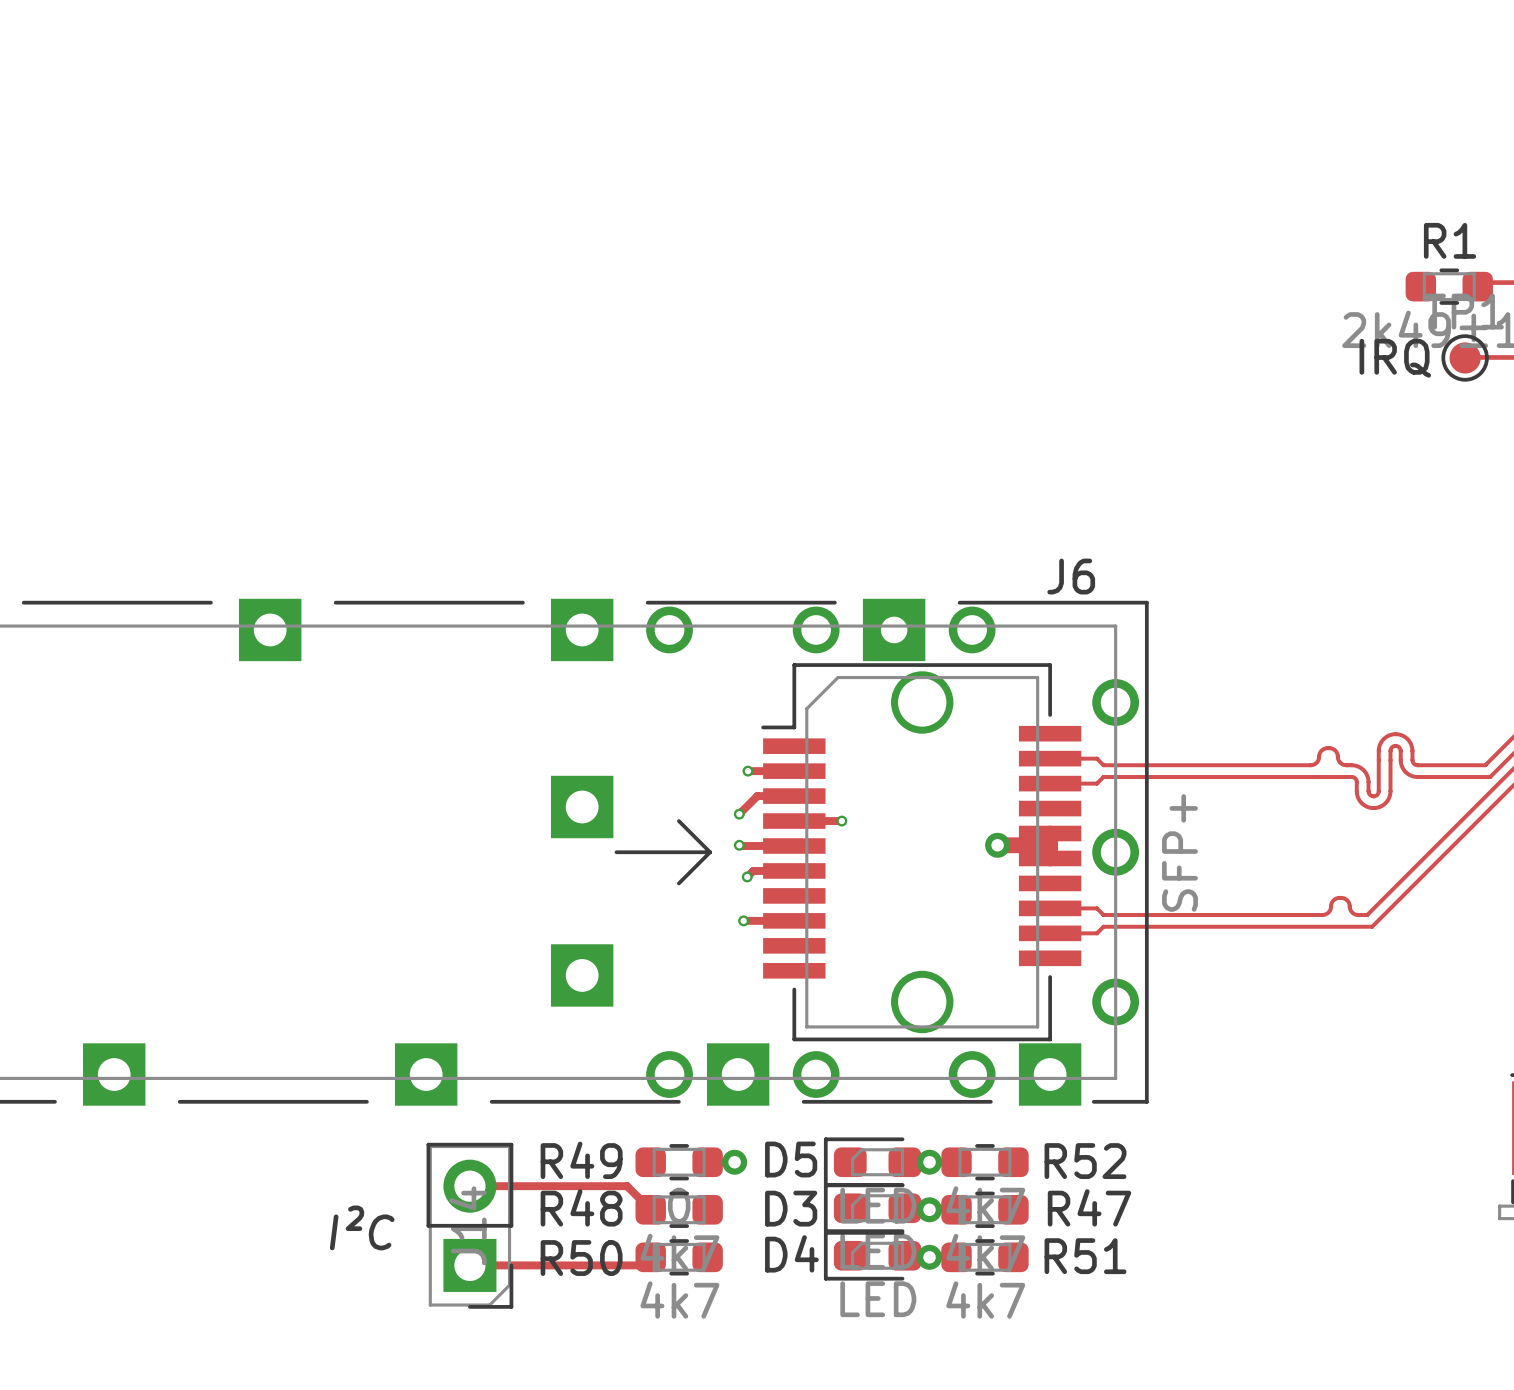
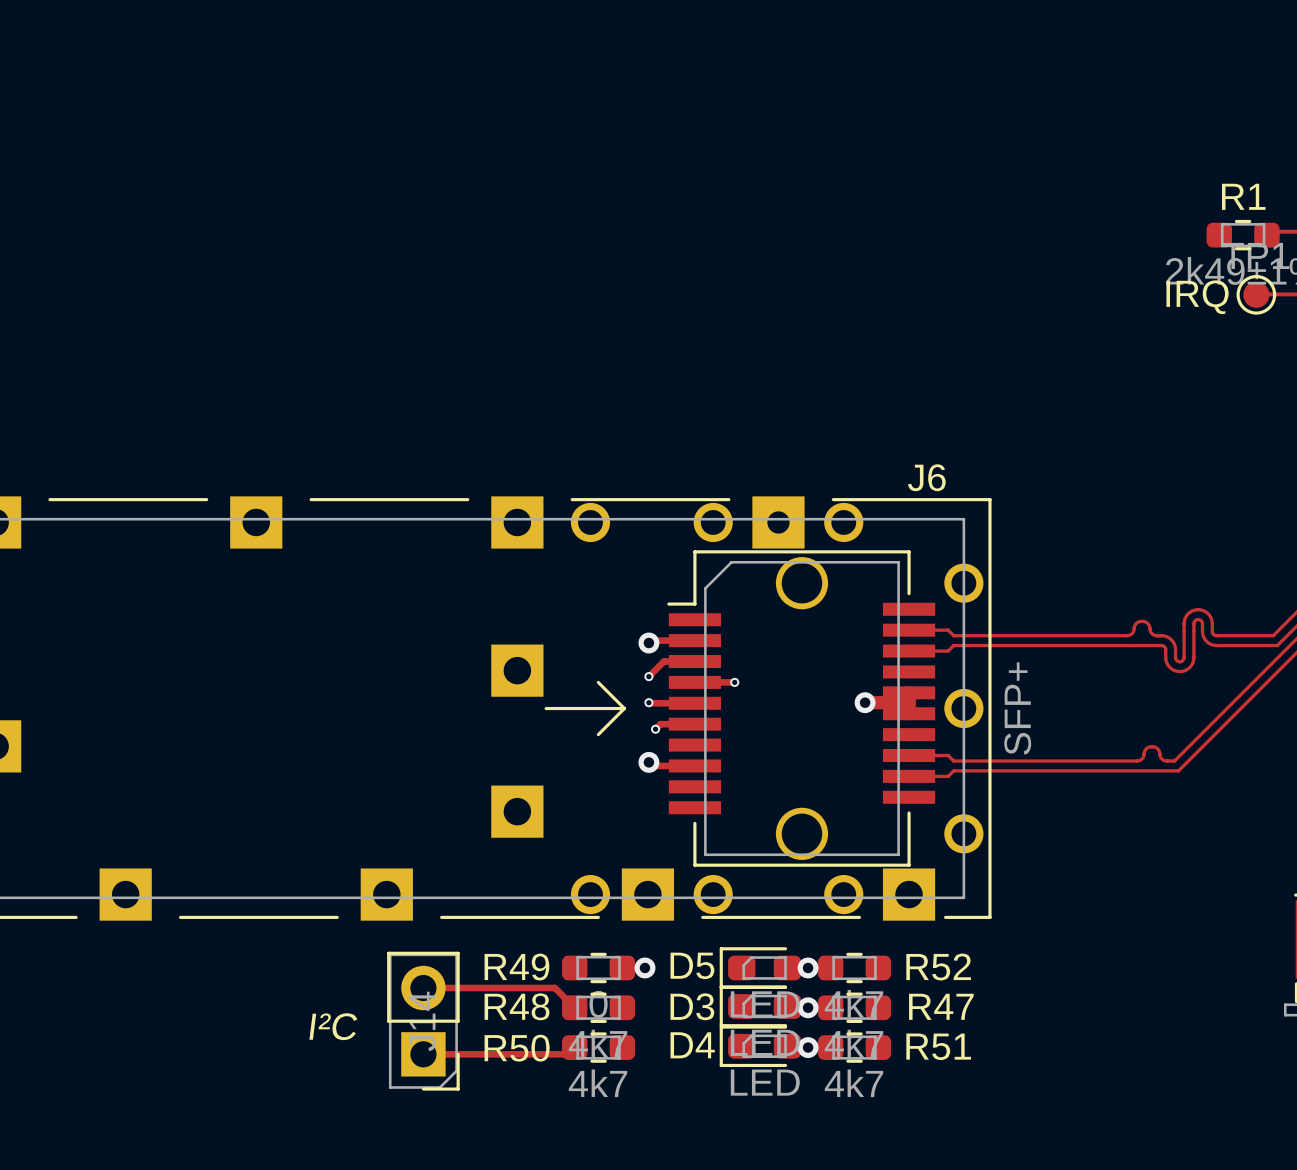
via size: [742, 765, 754, 777] -> [638, 632, 660, 654]
via size: [738, 915, 750, 927] -> [638, 751, 660, 773]

